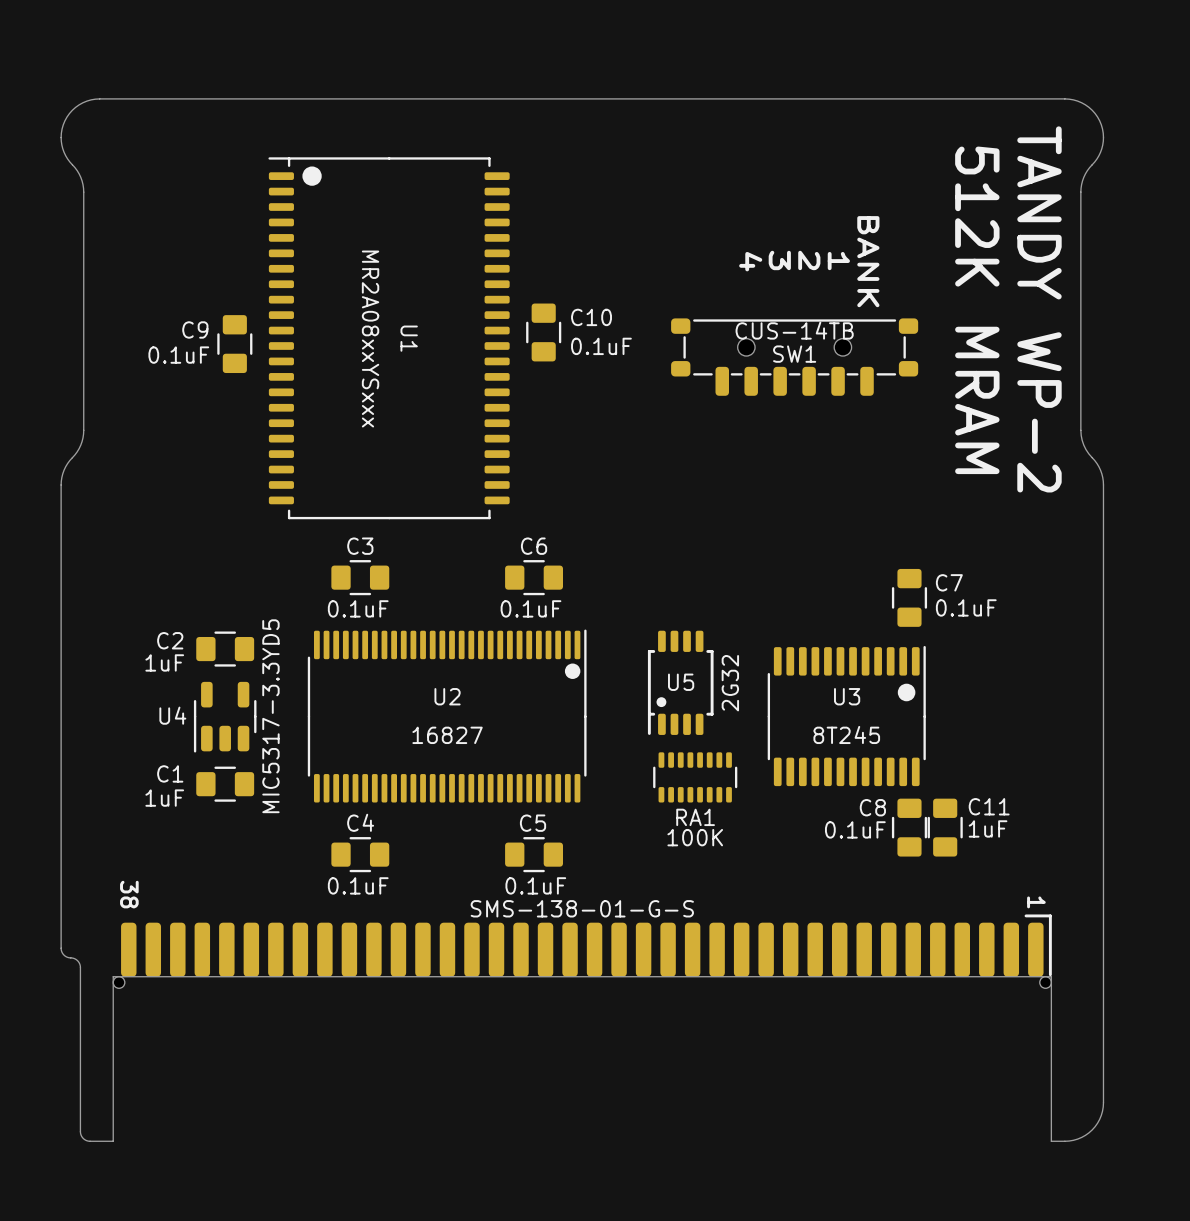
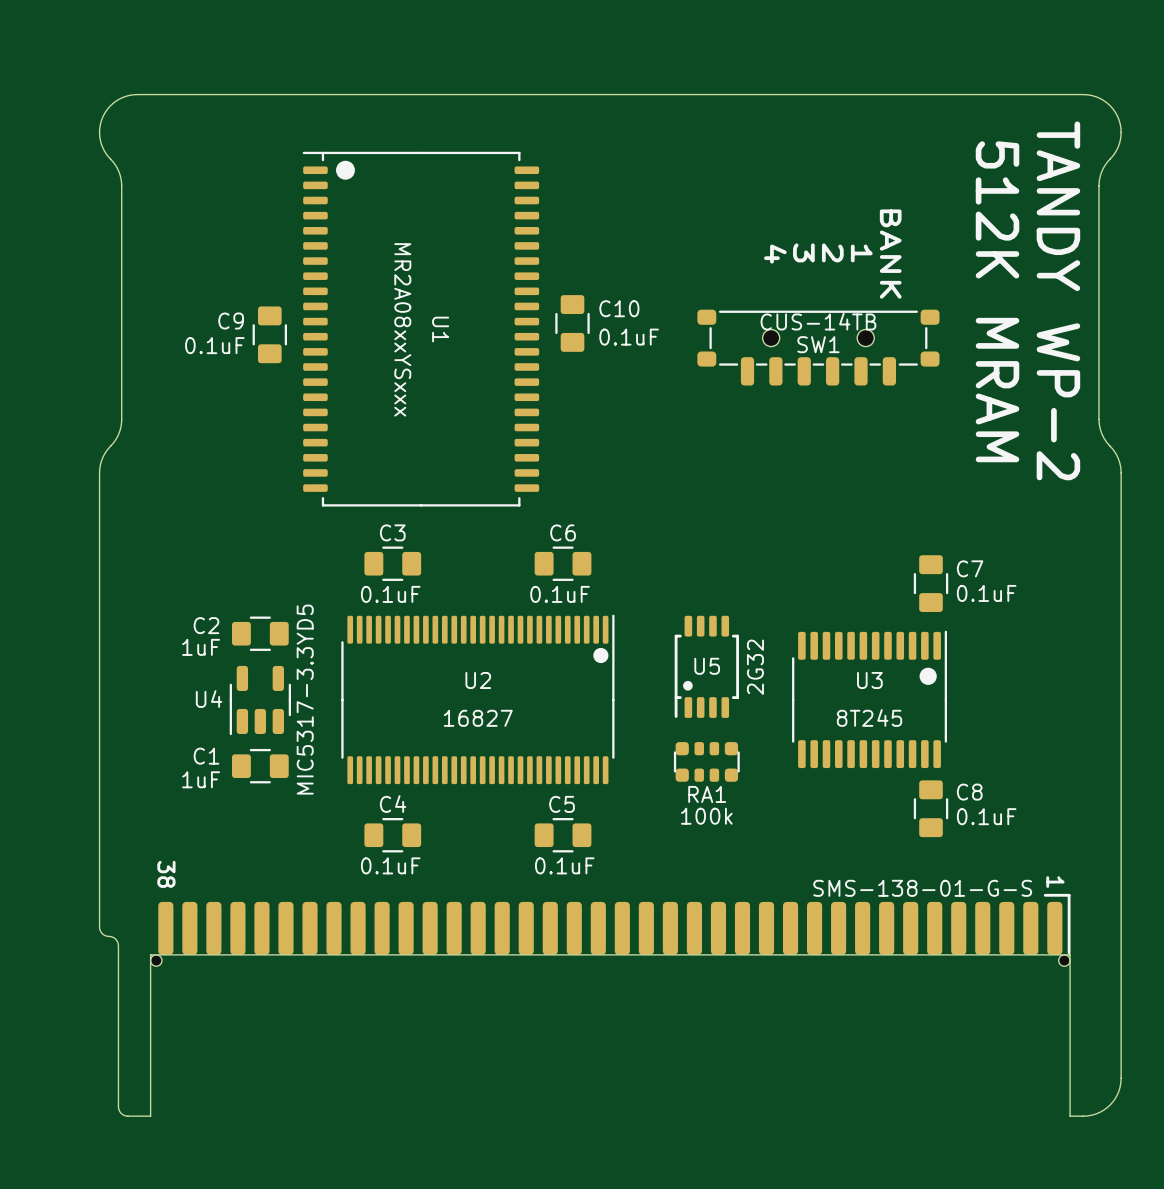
RA1 footprint: [653, 752, 738, 803] -> [673, 742, 740, 782]
C8 name position: C8 (872, 807) -> C8 (969, 792)
C11: 1uF (945, 827) -> none
C8 value position: 0.1uF (855, 829) -> 0.1uF (986, 816)
RA1 value: 100K (695, 837) -> 100k (706, 816)
part value position: SMS-138-01-G-S (582, 908) -> SMS-138-01-G-S (922, 888)

